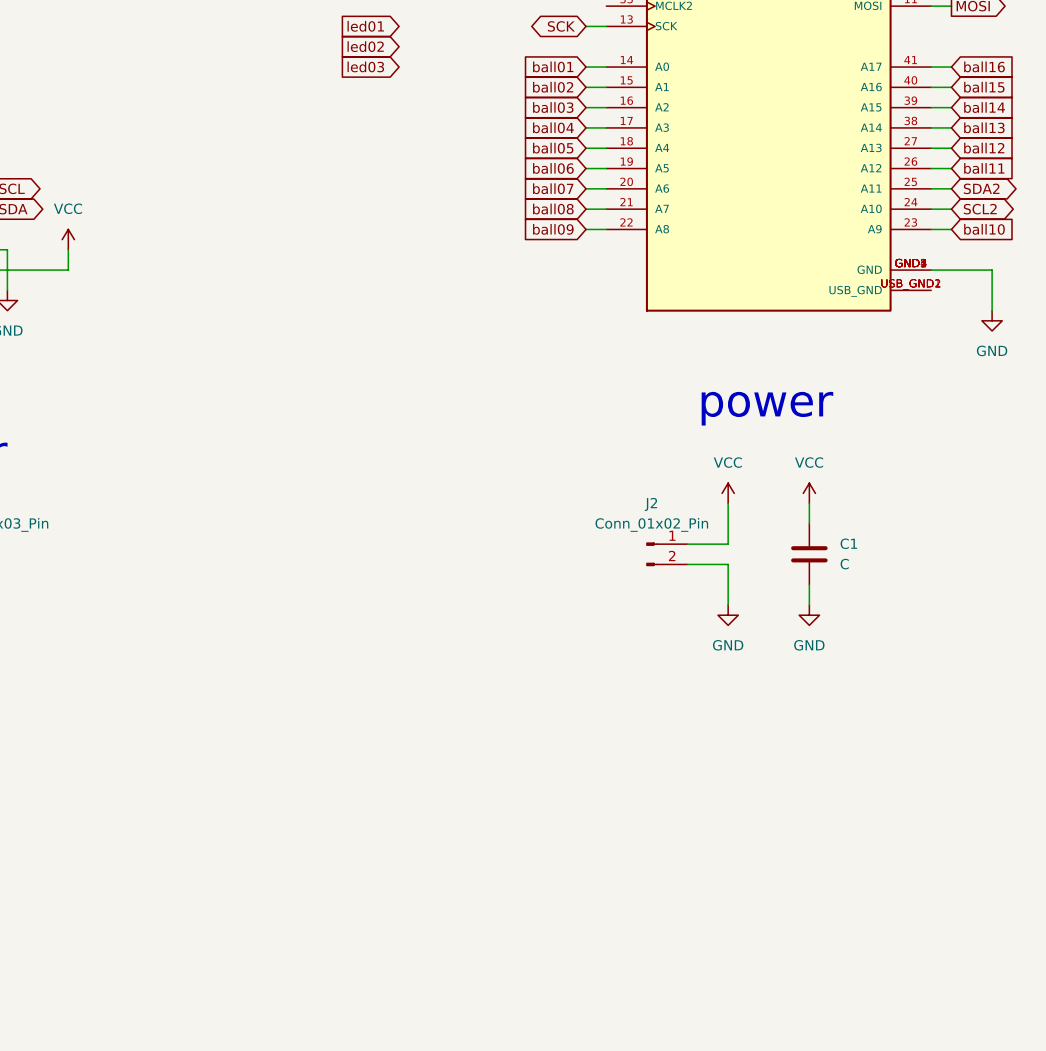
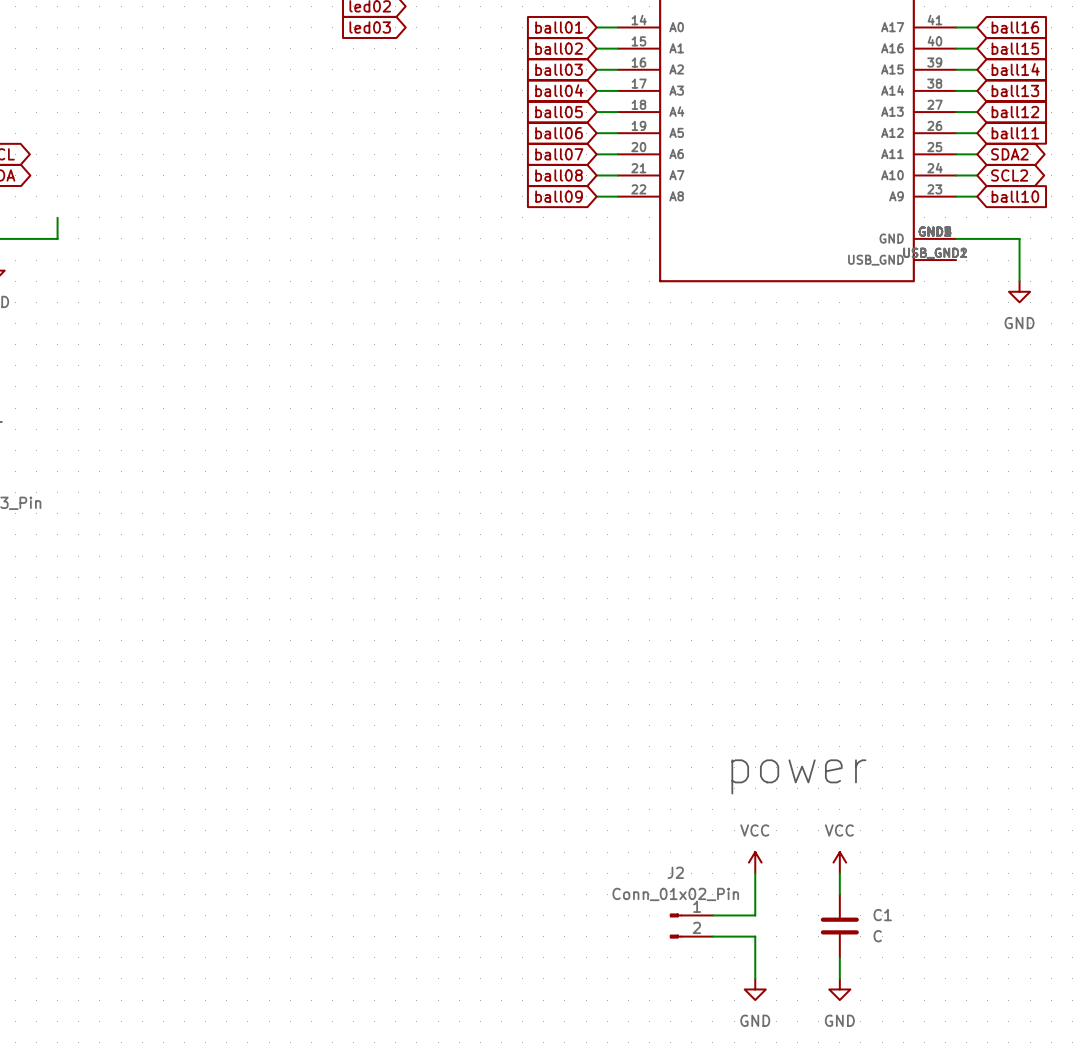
power symbol: VCC (68, 239) -> none
text: power (767, 408) -> none
power symbol: VCC (728, 493) -> none
power symbol: VCC (809, 493) -> none
wire: (728, 503) (728, 544) (687, 544) -> none
wire: (809, 503) (809, 523) -> none
J2 position: (666, 554) -> (691, 926)
C1 position: (809, 554) -> (839, 926)
wire: (687, 564) (728, 564) (728, 605) -> none
wire: (809, 584) (809, 605) -> none
power symbol: GND (728, 615) -> none
power symbol: GND (809, 615) -> none
text: none -> power (798, 776)
power symbol: none -> VCC (755, 862)
power symbol: none -> VCC (839, 862)
wire: none -> (755, 873) (755, 915) (712, 915)
wire: none -> (839, 873) (839, 894)
wire: none -> (712, 936) (755, 936) (755, 978)
wire: none -> (839, 957) (839, 978)
power symbol: none -> GND (755, 989)
power symbol: none -> GND (839, 989)

